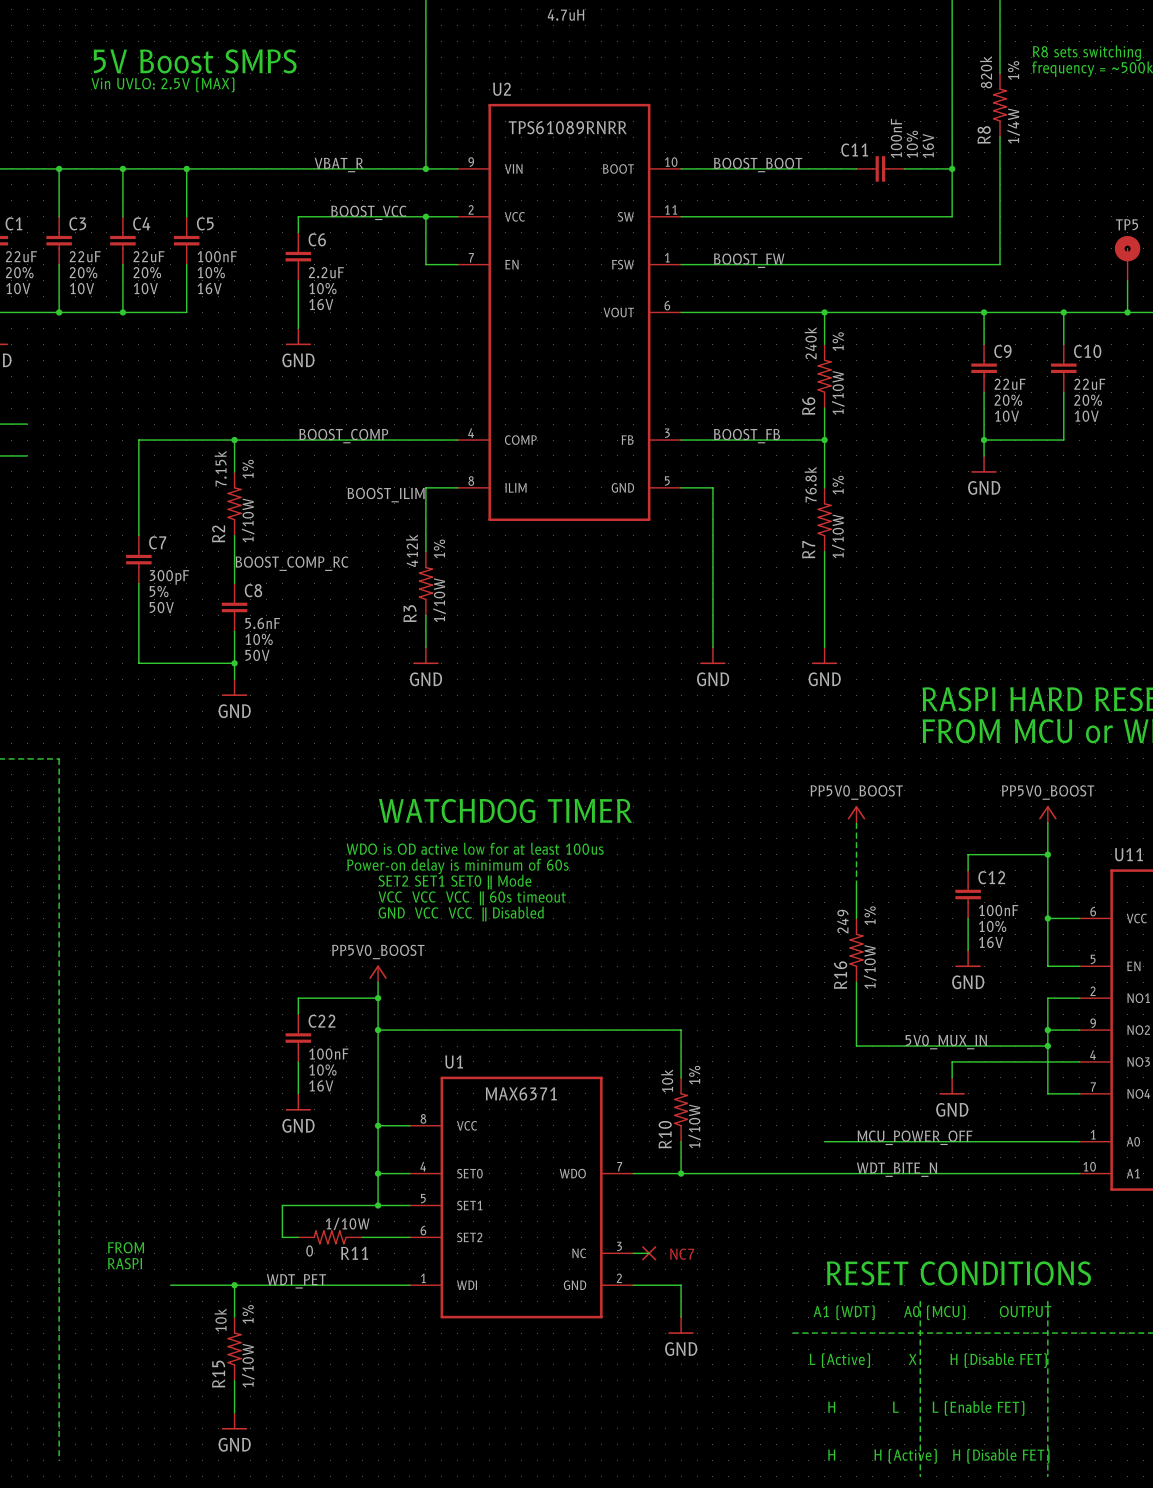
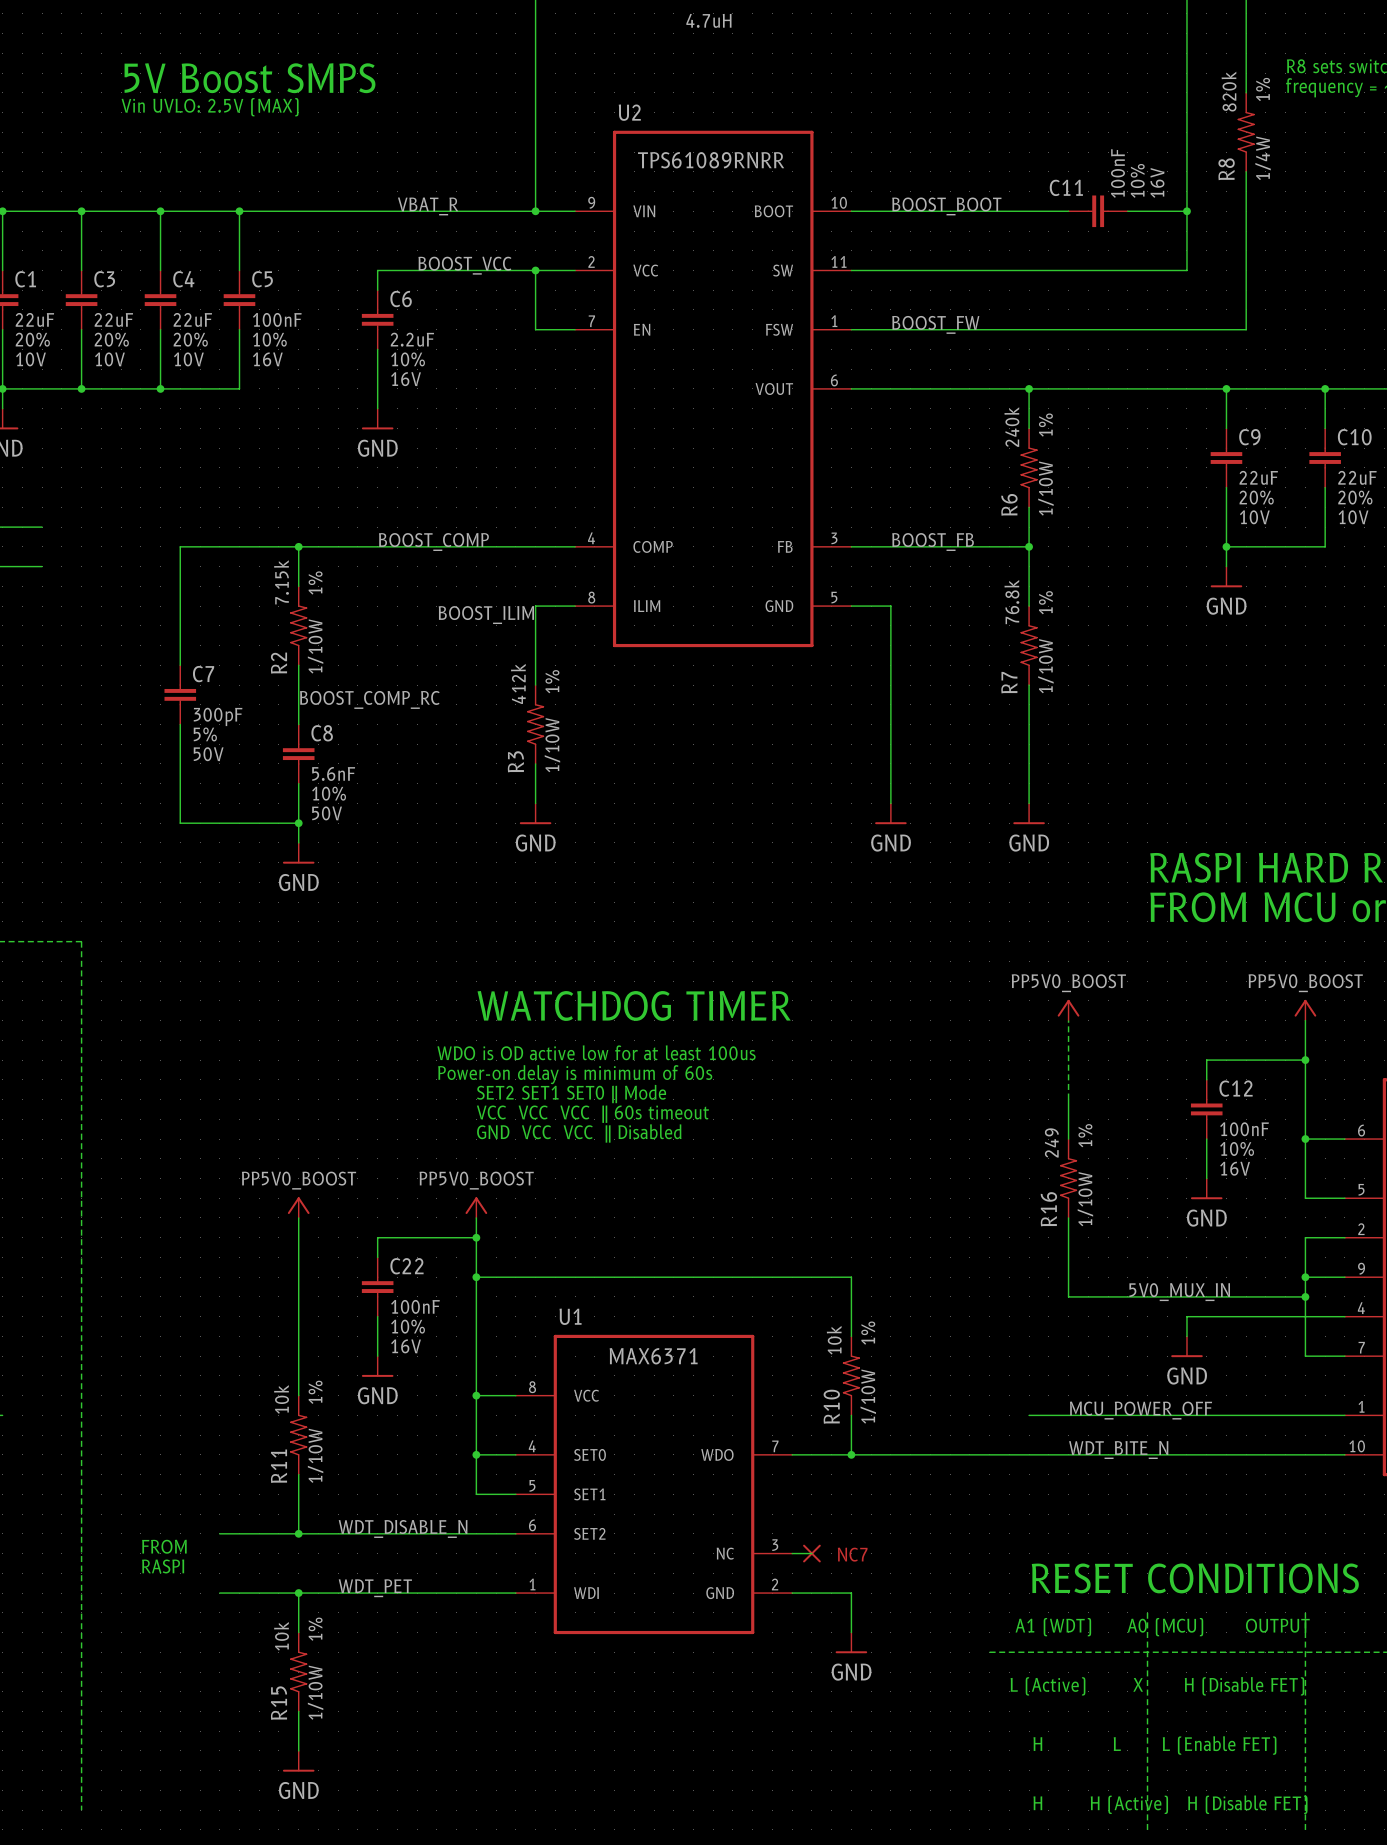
power symbol: none -> PP5V0_BOOST (298, 1207)
wire: none -> (298, 1217) (298, 1395)
R11 text: none -> 1% (315, 1392)
wire: none -> (298, 1474) (298, 1533)
wire: (378, 1205) (282, 1205) (282, 1237) -> (219, 1533) (357, 1533)
junction: (378, 1205) -> none
label: none -> WDT_DISABLE_N (403, 1528)
junction: none -> (298, 1533)
R11 rotation: 0° (330, 1237) -> 90° clockwise (298, 1435)
R11 position: (330, 1237) -> (298, 1435)
R11 value: 0 (309, 1251) -> 10k (281, 1399)

